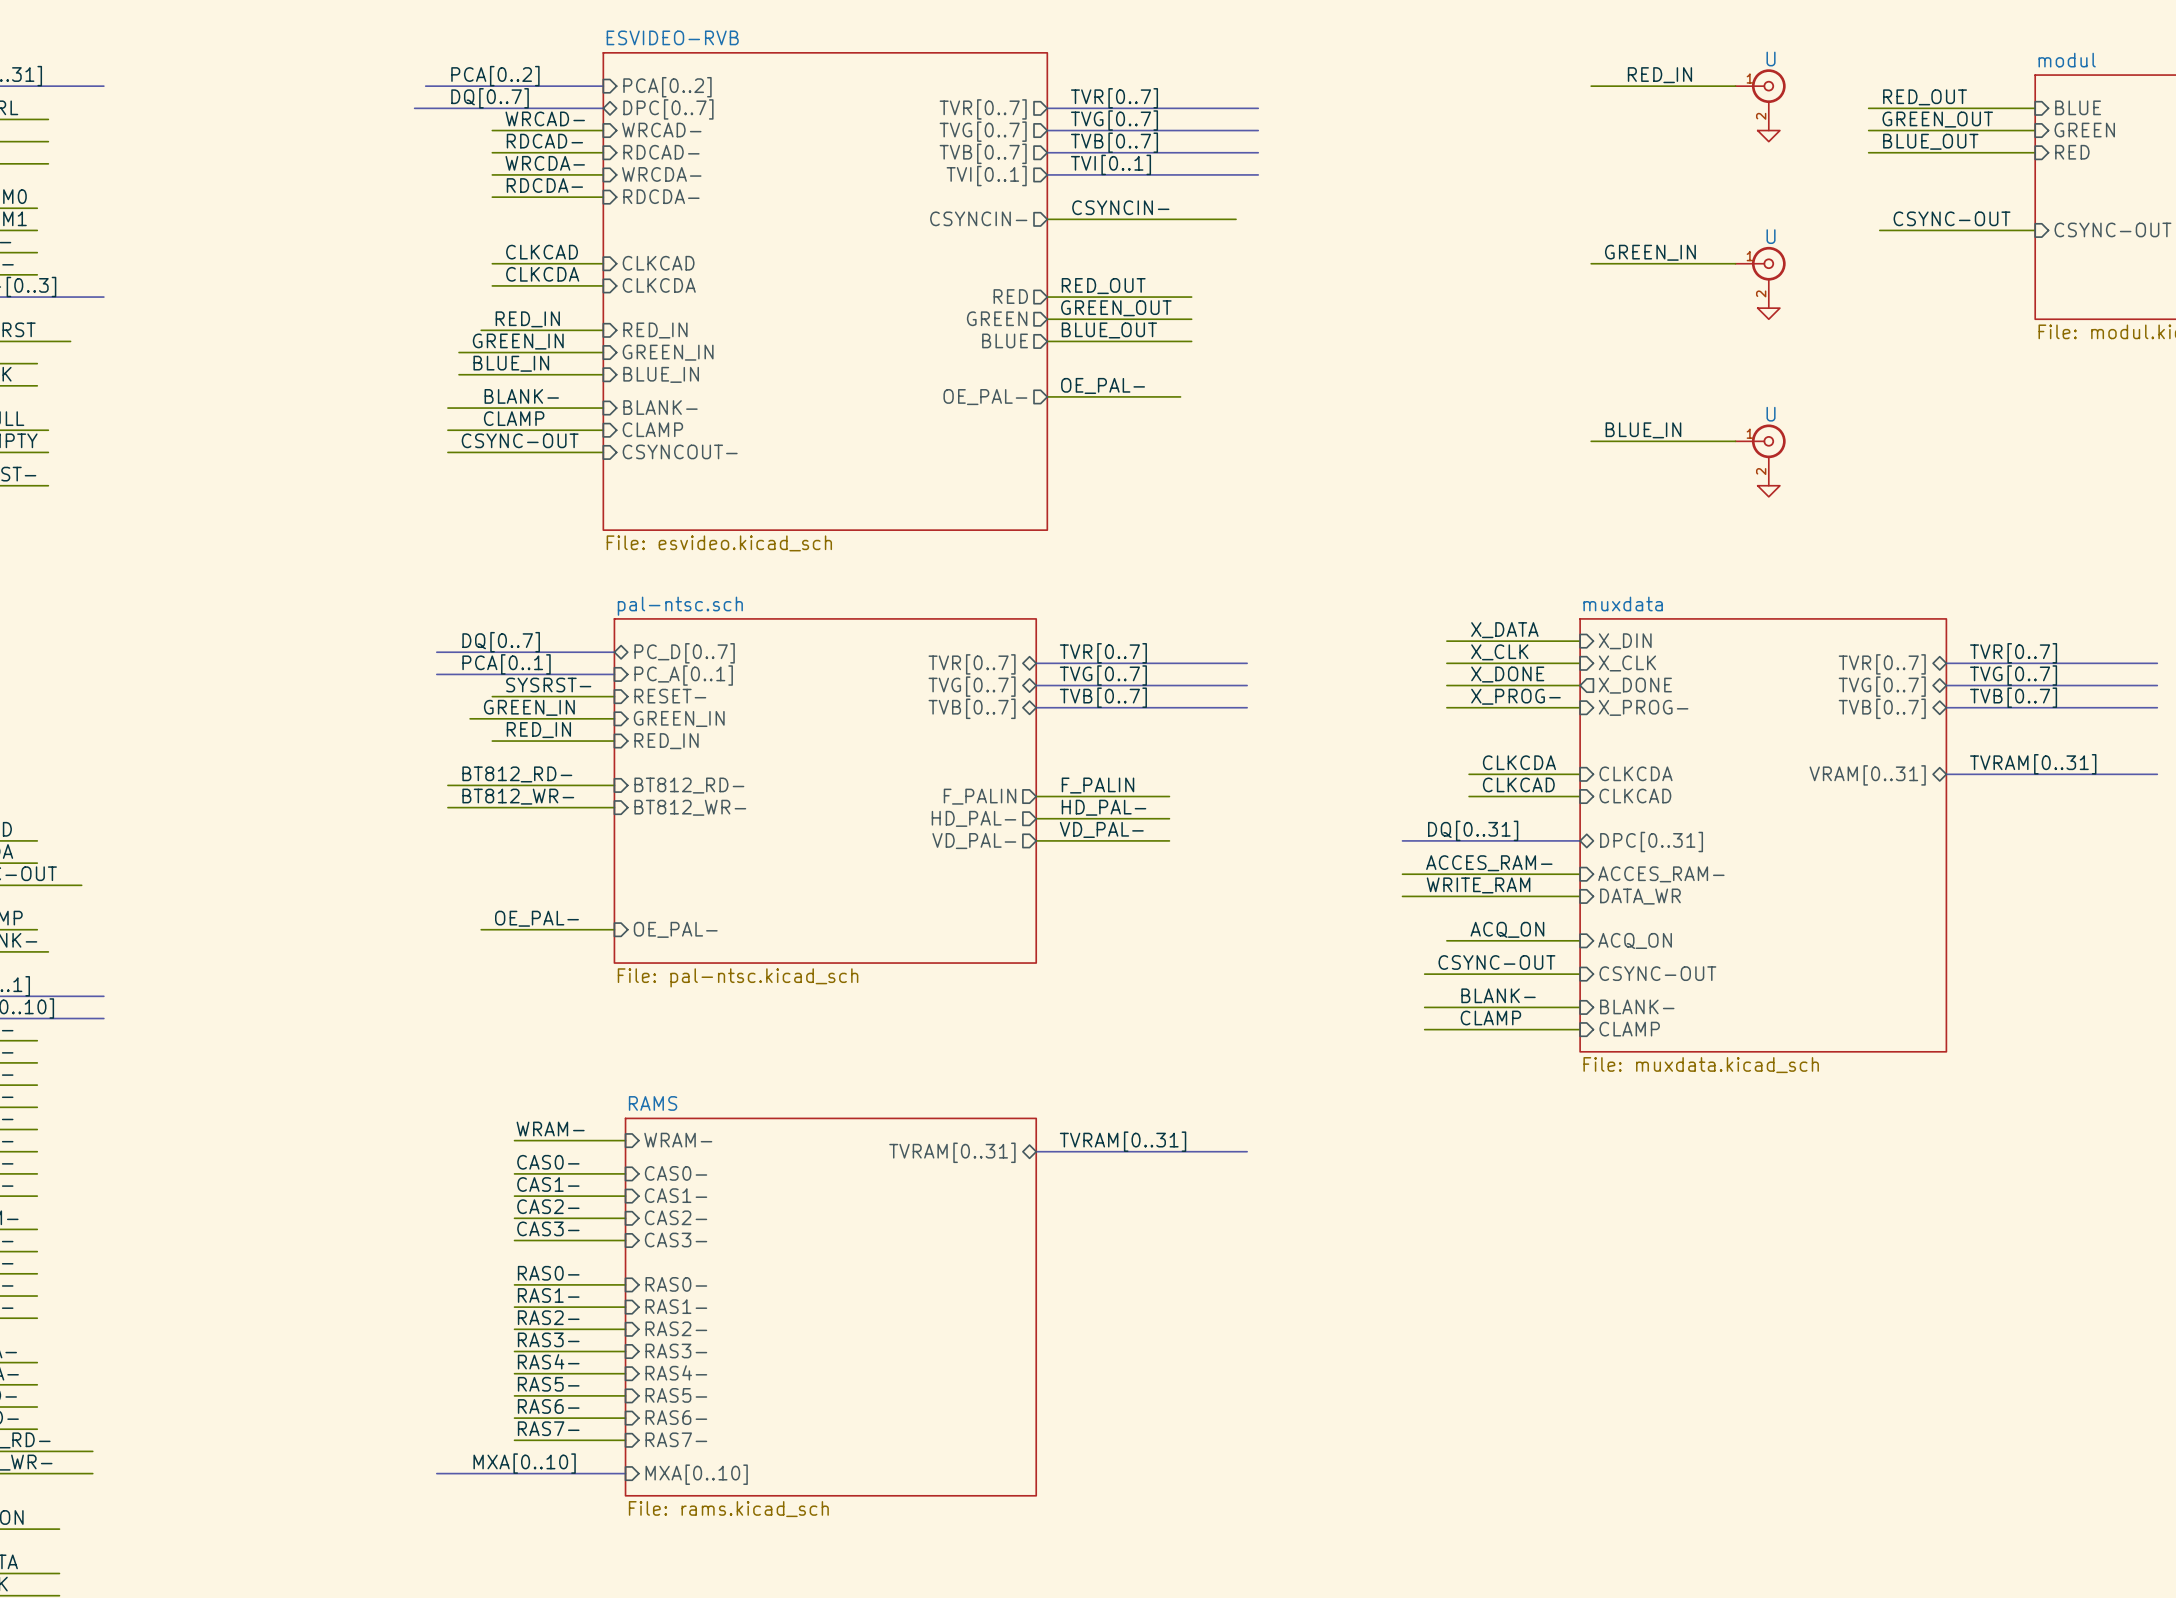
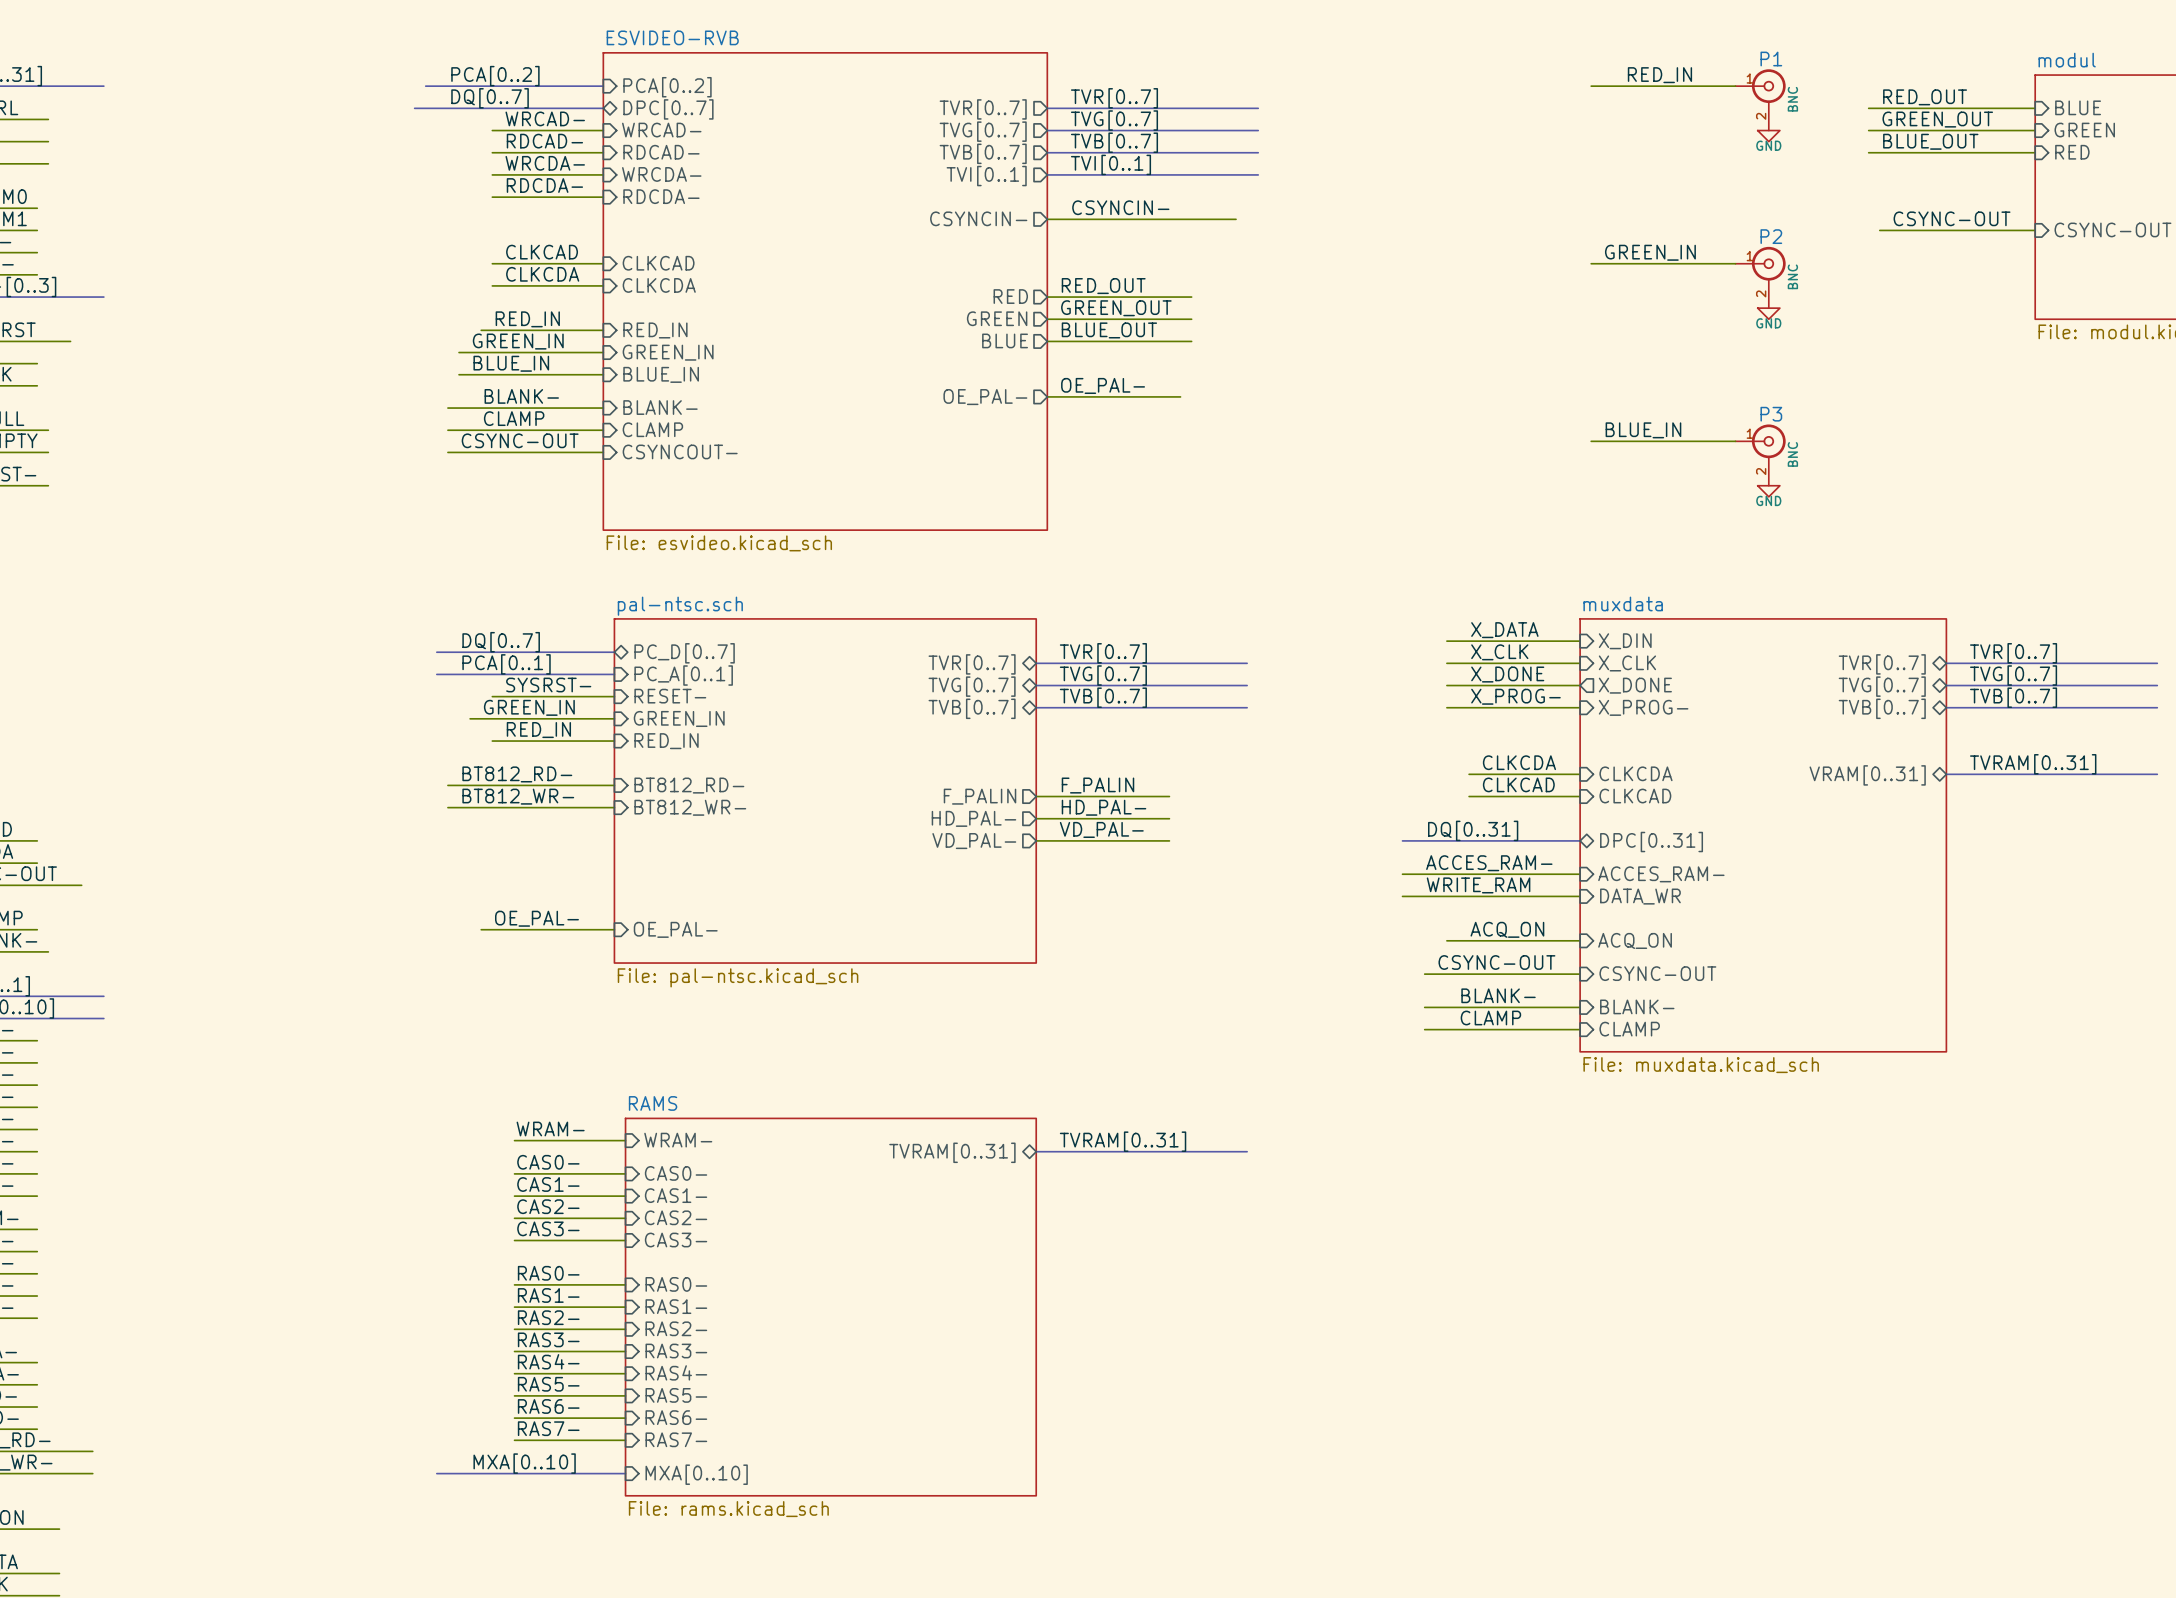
U name: U (1771, 59) -> P1 (1771, 59)
U value: none -> BNC (1792, 99)
power symbol text: none -> GND (1768, 145)
U name: U (1771, 236) -> P2 (1771, 236)
U value: none -> BNC (1792, 276)
power symbol text: none -> GND (1768, 323)
U name: U (1771, 414) -> P3 (1771, 414)
U value: none -> BNC (1792, 454)
power symbol text: none -> GND (1768, 500)

